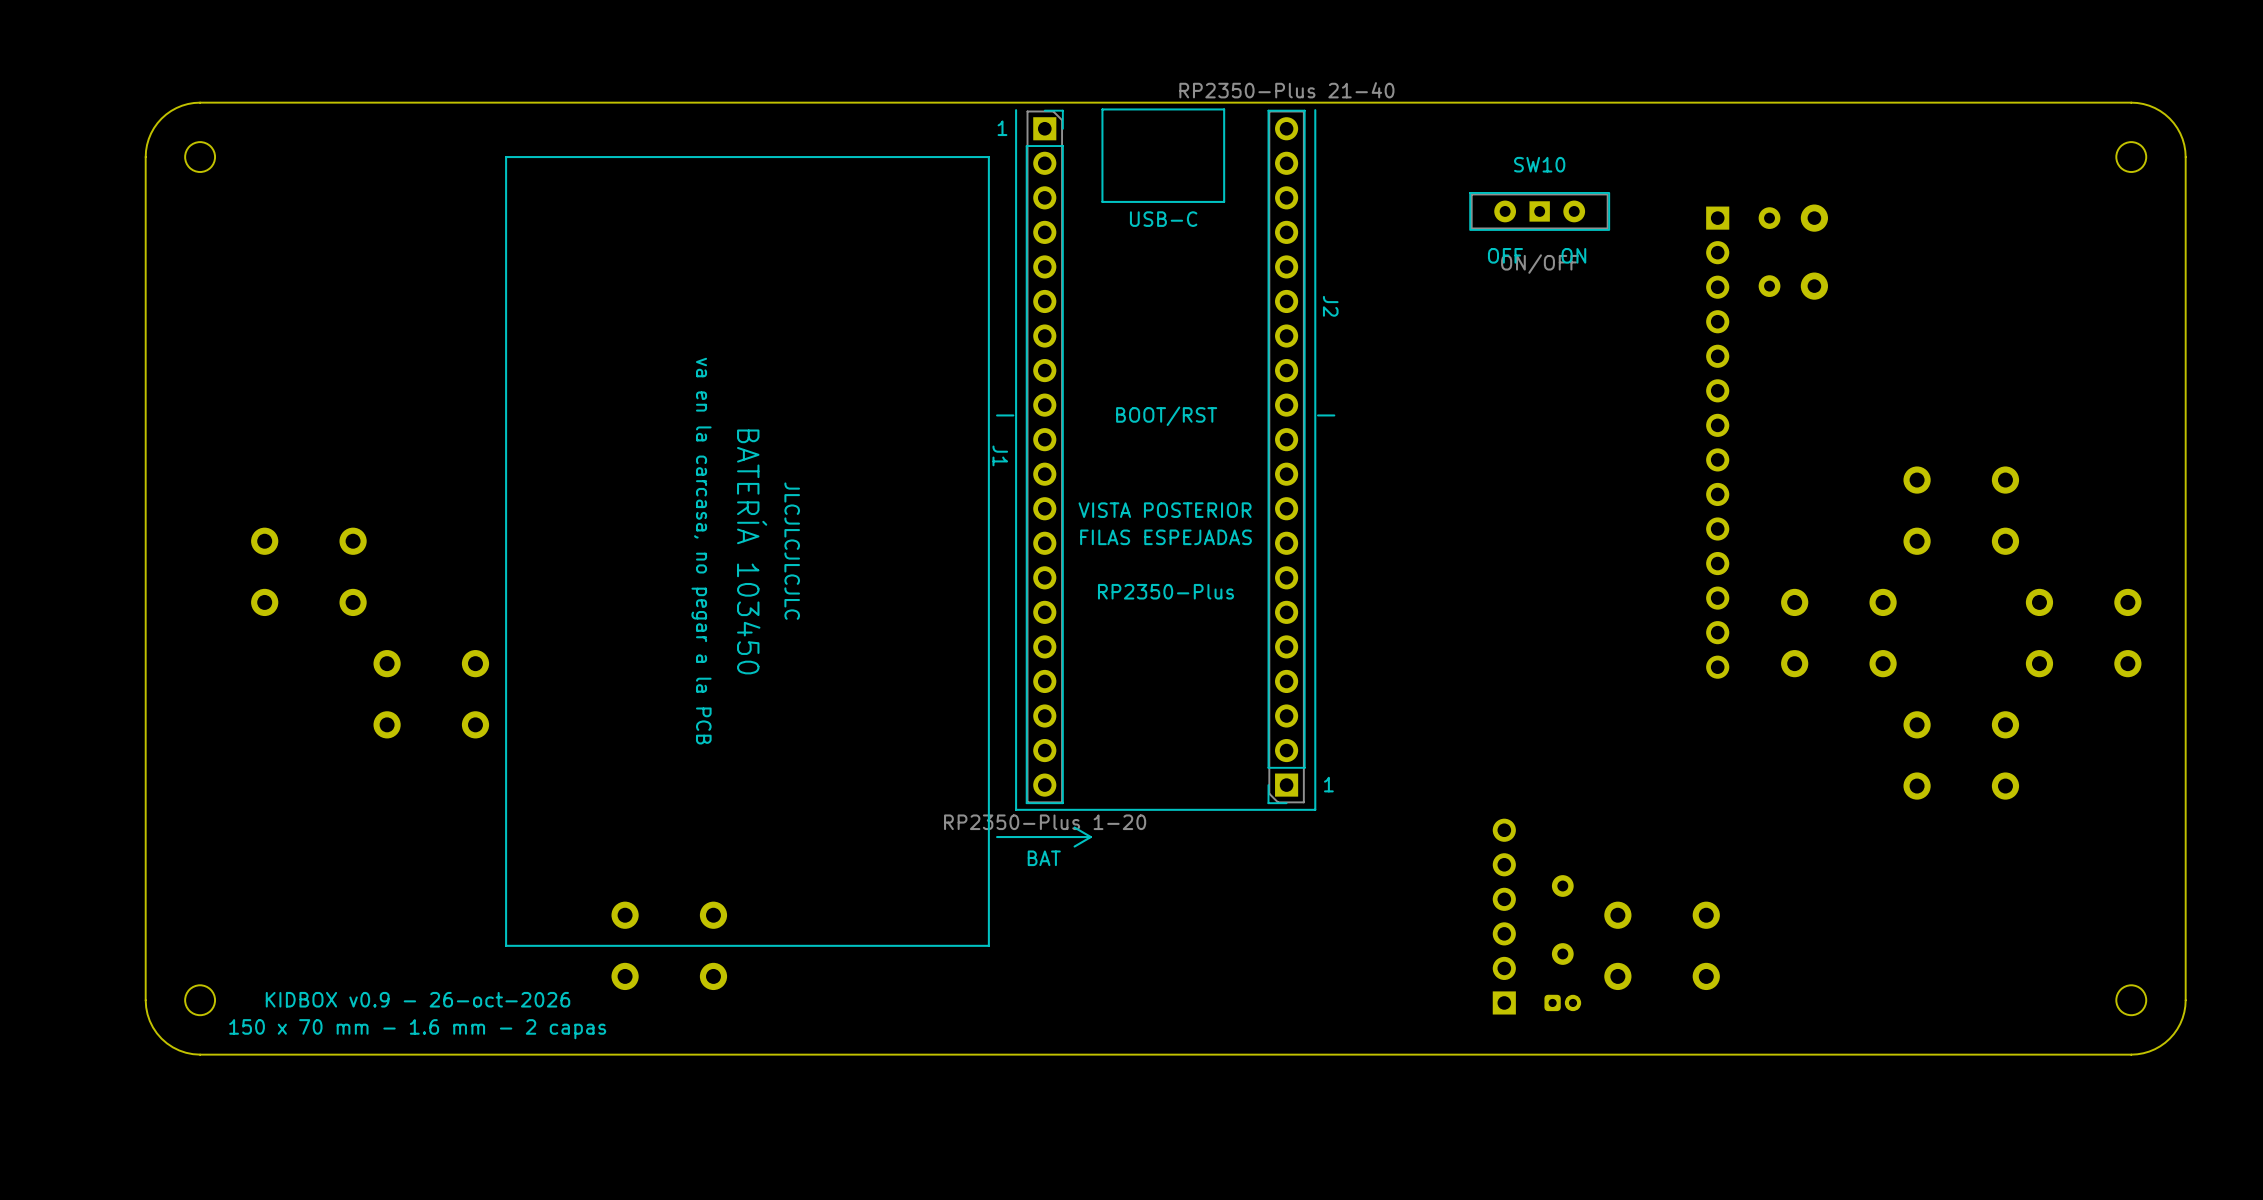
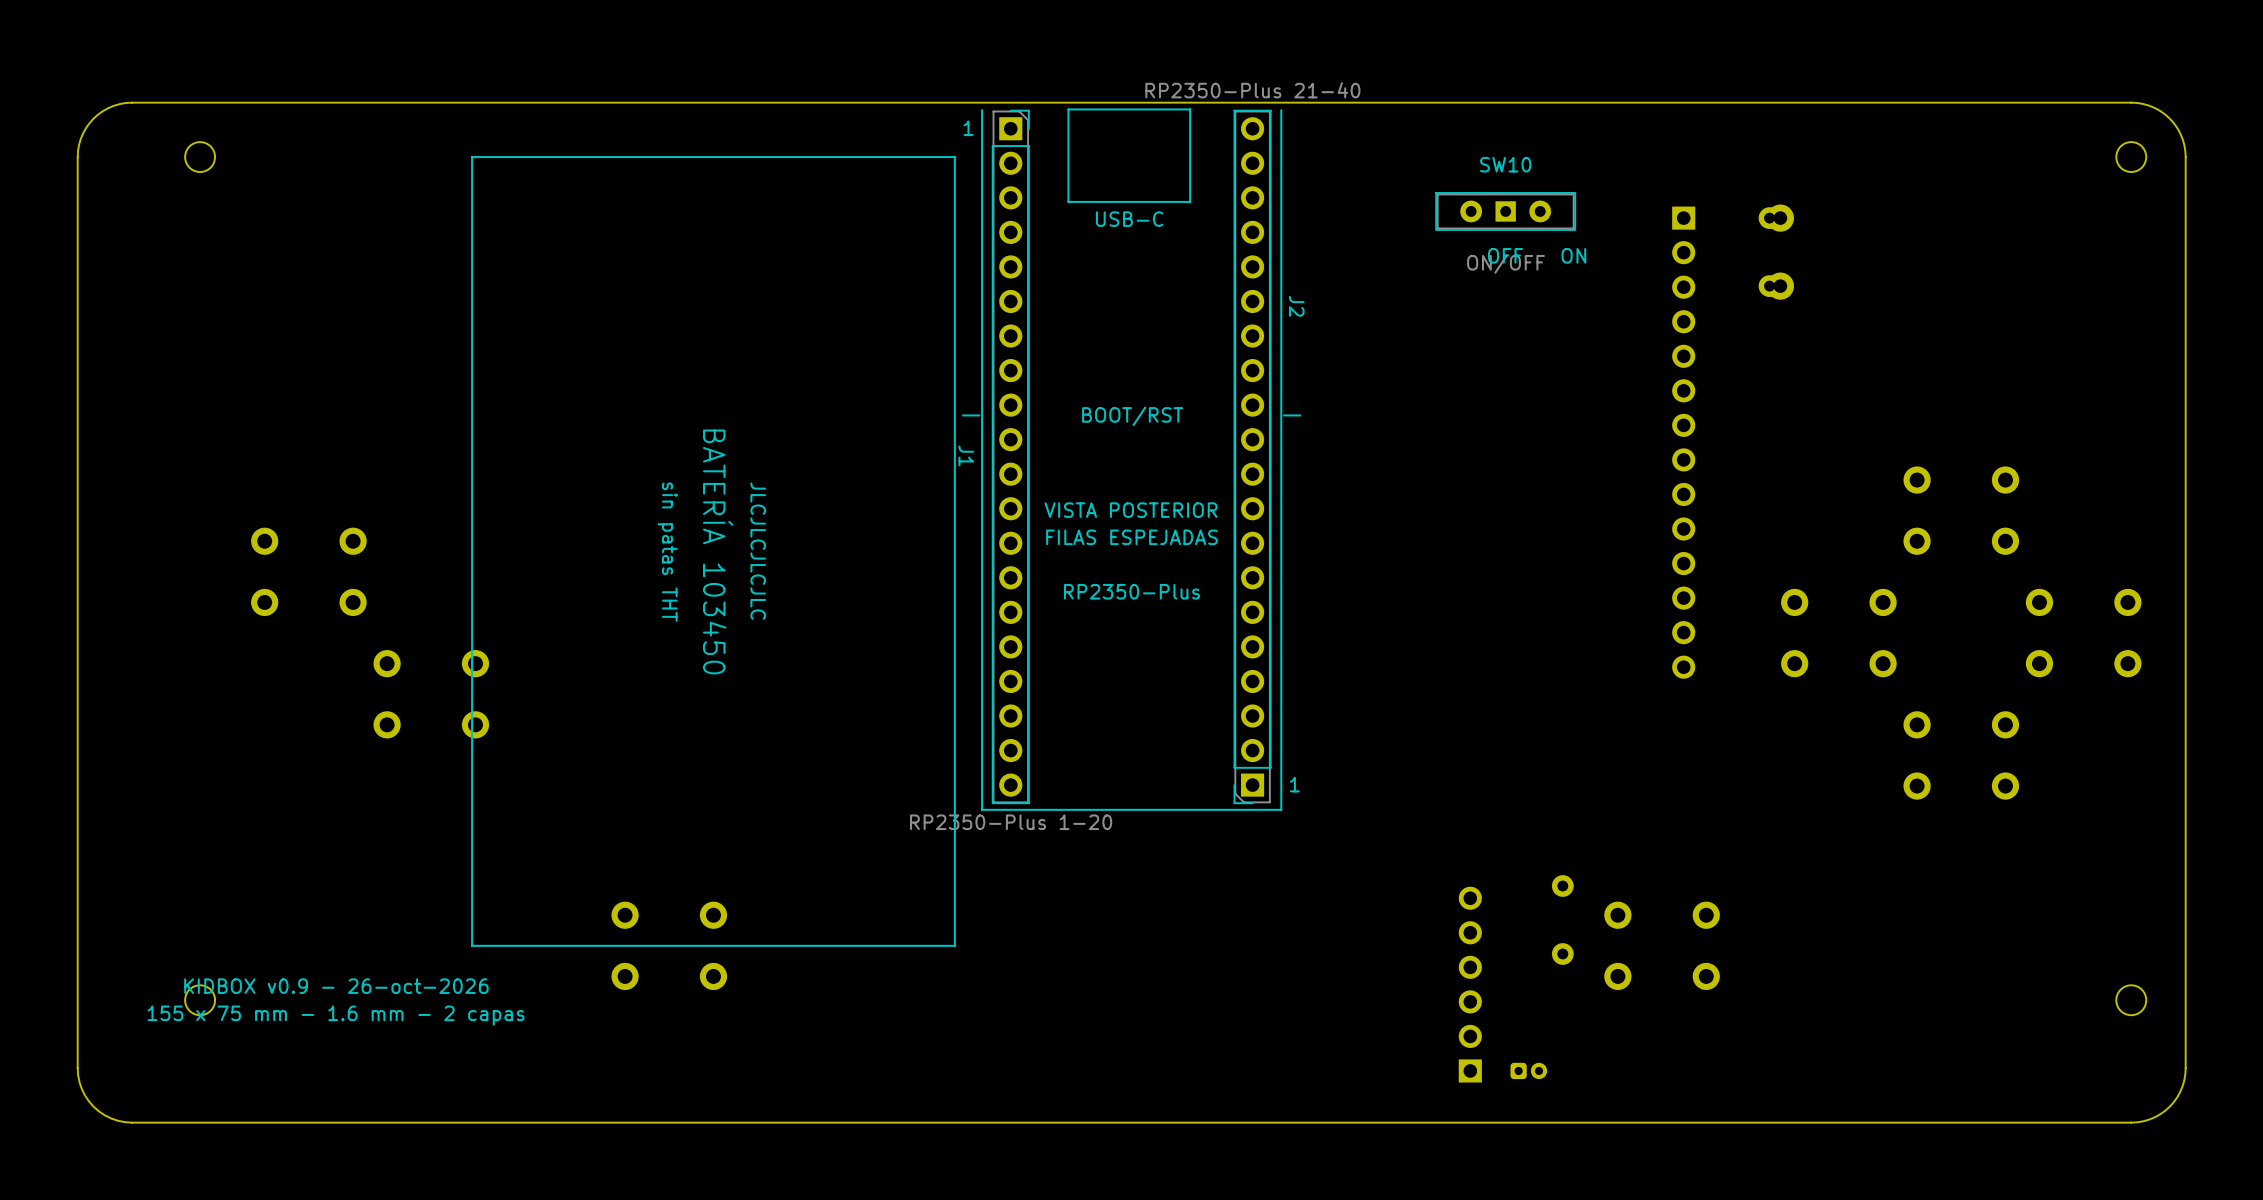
board edge: (200, 102) (176, 108) (161, 118) (151, 133) (145, 157) (145, 1000) (149, 1021) (156, 1033) (166, 1043) (179, 1050) (200, 1054) (2131, 1054) (2149, 1051) (2169, 1038) (2180, 1023) (2185, 1000) -> (200, 102) (132, 102) (114, 105) (98, 114) (89, 123) (80, 139) (78, 150) (77, 1068) (81, 1089) (88, 1101) (98, 1111) (111, 1118) (132, 1122) (2137, 1122) (2149, 1119) (2165, 1110) (2177, 1097) (2182, 1086) (2185, 1068) (2185, 1000)
line: (1102, 109) (1102, 201) -> (1102, 109) (1068, 109) (1068, 201) (1102, 201)
line: (1190, 109) (1224, 109) (1224, 201) (1190, 201) -> (1190, 109) (1190, 201)
line: (1016, 110) (1016, 809) -> (982, 110) (982, 809) (1016, 809)
line: (1315, 110) (1315, 809) (1281, 809) -> (1281, 110) (1281, 809)
text position: 1 (1002, 128) -> 1 (968, 128)
line: (506, 157) (506, 945) -> (506, 157) (472, 157) (472, 945) (506, 945)
line: (954, 157) (988, 157) (988, 945) (954, 945) -> (954, 157) (954, 945)
SW10 position: (1539, 211) -> (1505, 211)
part position: (1814, 218) -> (1780, 218)
text position: USB-C (1163, 219) -> USB-C (1129, 219)
part position: (1814, 286) -> (1780, 286)
line: (1013, 415) (997, 415) -> (979, 415) (963, 415)
line: (1334, 415) (1318, 415) -> (1300, 415) (1284, 415)
text position: BOOT/RST (1166, 416) -> BOOT/RST (1132, 416)
part position: (1717, 442) -> (1683, 442)
J1 position: (1044, 456) -> (1010, 456)
J2 position: (1286, 456) -> (1252, 456)
text position: VISTA POSTERIOR (1165, 510) -> VISTA POSTERIOR (1131, 510)
text position: FILAS ESPEJADAS (1166, 537) -> FILAS ESPEJADAS (1132, 537)
text: va en la carcasa, no pegar a la PCB (701, 551) -> none
text position: BATERÍA 103450 (752, 551) -> BATERÍA 103450 (718, 551)
text position: JLCJLCJLCJLC (792, 551) -> JLCJLCJLCJLC (758, 551)
text: none -> sin patas THT (667, 552)
text position: RP2350-Plus (1166, 591) -> RP2350-Plus (1132, 591)
text position: 1 (1328, 784) -> 1 (1294, 784)
line: (1074, 827) (1090, 837) -> none
line: (1090, 837) (1074, 846) -> none
line: (1090, 837) (997, 837) -> none
text: BAT (1044, 858) -> none
part position: (1504, 916) -> (1470, 984)
text position: KIDBOX v0.9 - 26-oct-2026 (418, 999) -> KIDBOX v0.9 - 26-oct-2026 (336, 986)
part position: (1562, 1002) -> (1528, 1070)
text: 150 x 70 mm - 1.6 mm - 2 capas (417, 1029) -> 155 x 75 mm - 1.6 mm - 2 capas (336, 1015)

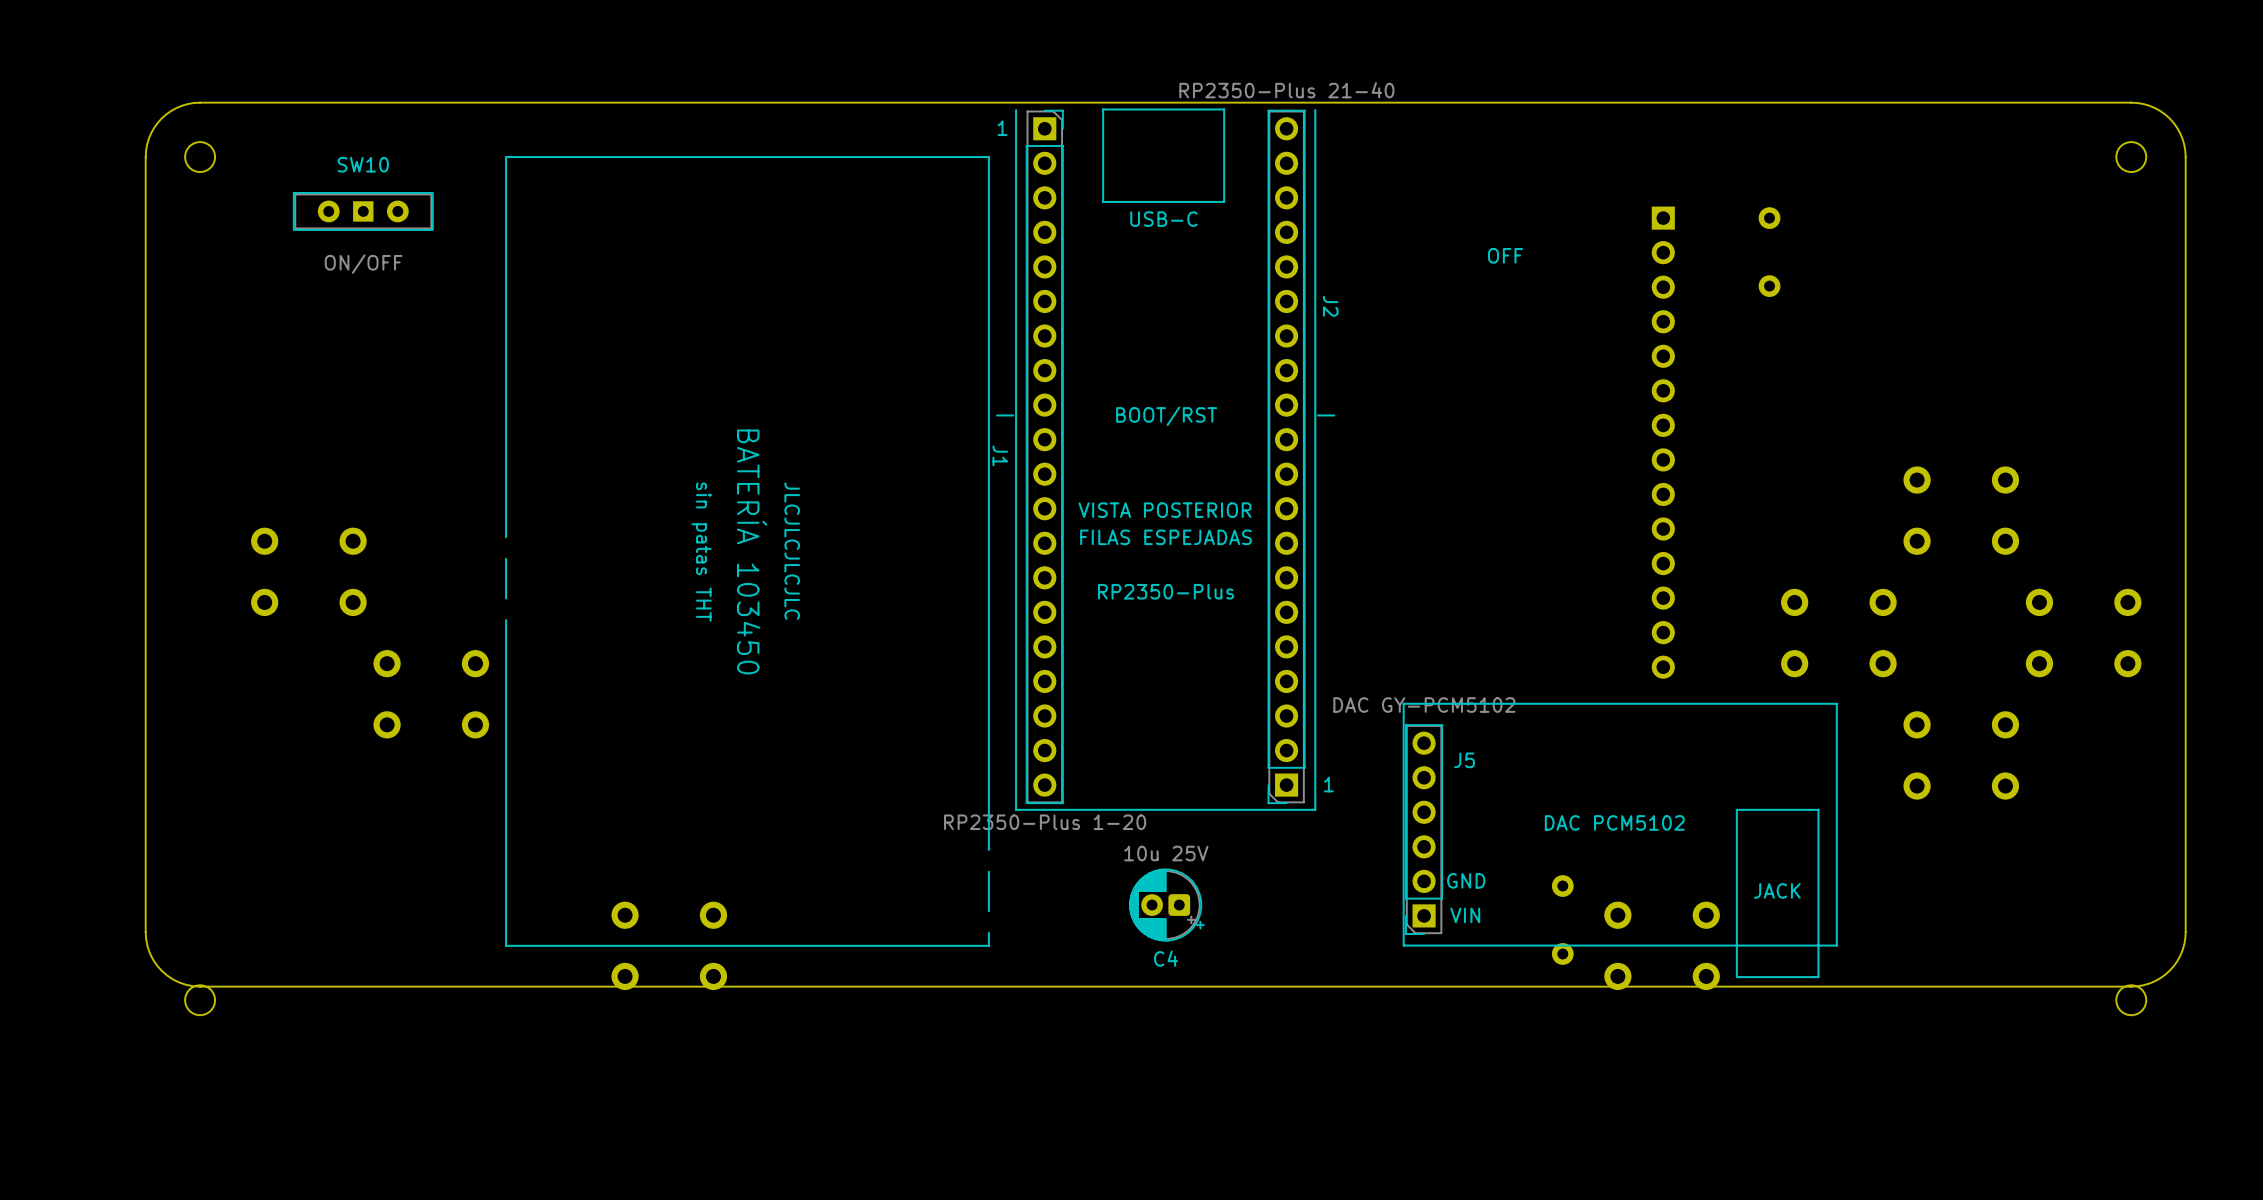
board edge: (200, 102) (132, 102) (114, 105) (98, 114) (89, 123) (80, 139) (78, 150) (77, 1068) (81, 1089) (88, 1101) (98, 1111) (111, 1118) (132, 1122) (2137, 1122) (2149, 1119) (2165, 1110) (2177, 1097) (2184, 1080) (2185, 932) -> (200, 102) (176, 108) (161, 118) (151, 133) (145, 157) (145, 932) (149, 953) (156, 965) (166, 975) (179, 982) (200, 986) (2131, 986) (2149, 983) (2169, 970) (2180, 955) (2185, 932)
line: (1103, 109) (1068, 109) (1068, 201) (1103, 201) -> (1103, 109) (1103, 201)
line: (1190, 109) (1190, 201) -> (1190, 109) (1224, 109) (1224, 201) (1190, 201)
line: (982, 110) (982, 809) (1016, 809) -> (1016, 110) (1016, 809)
line: (1281, 110) (1281, 809) -> (1315, 110) (1315, 809) (1281, 809)
text position: 1 (968, 128) -> 1 (1002, 128)
line: (506, 157) (472, 157) (472, 945) (506, 945) -> (506, 157) (506, 537)
line: (954, 157) (954, 945) -> (954, 157) (988, 157) (988, 849)
SW10 position: (1505, 211) -> (363, 211)
part: (1780, 218) -> none
text position: USB-C (1129, 219) -> USB-C (1163, 219)
text: ON (1573, 255) -> none
part: (1780, 286) -> none
line: (979, 415) (963, 415) -> (1013, 415) (997, 415)
line: (1300, 415) (1284, 415) -> (1334, 415) (1318, 415)
text position: BOOT/RST (1132, 416) -> BOOT/RST (1166, 416)
part position: (1683, 442) -> (1663, 442)
J1 position: (1010, 456) -> (1044, 456)
J2 position: (1252, 456) -> (1286, 456)
text position: VISTA POSTERIOR (1131, 510) -> VISTA POSTERIOR (1165, 510)
text position: FILAS ESPEJADAS (1132, 537) -> FILAS ESPEJADAS (1166, 537)
text position: BATERÍA 103450 (718, 551) -> BATERÍA 103450 (752, 551)
text position: JLCJLCJLCJLC (758, 551) -> JLCJLCJLCJLC (792, 551)
text position: sin patas THT (667, 552) -> sin patas THT (701, 552)
line: none -> (506, 558) (506, 598)
text position: RP2350-Plus (1132, 591) -> RP2350-Plus (1166, 591)
line: none -> (506, 620) (506, 945)
line: none -> (1836, 703) (1403, 703) (1403, 945) (1836, 945) (1836, 703)
text position: 1 (1294, 784) -> 1 (1328, 784)
line: none -> (1818, 809) (1736, 809) (1736, 977) (1818, 977) (1818, 809)
text: none -> DAC PCM5102 (1614, 822)
line: none -> (988, 871) (988, 911)
text: none -> GND (1466, 880)
text: none -> JACK (1777, 890)
C4: none -> 10u 25V (1166, 905)
text: none -> VIN (1465, 915)
line: none -> (988, 932) (988, 945) (954, 945)
J5 side: top (1470, 984) -> bottom (1424, 829)
text: KIDBOX v0.9 - 26-oct-2026 (336, 986) -> none
text: 155 x 75 mm - 1.6 mm - 2 capas (336, 1015) -> none
part: (1528, 1070) -> none

